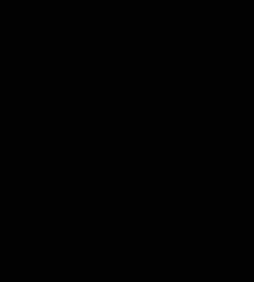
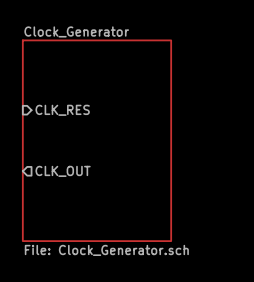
sheet pin: none -> CLK_RES (62, 110)
sheet Clock_Generator: none -> File: Clock_Generator.sch (97, 140)
sheet pin: none -> CLK_OUT (63, 171)

